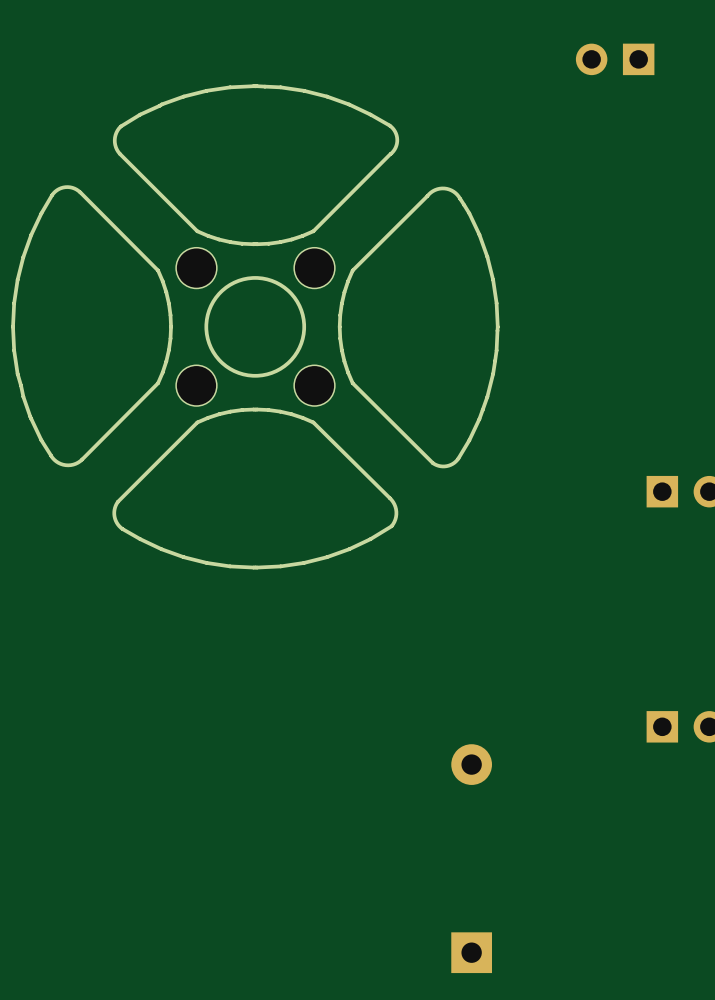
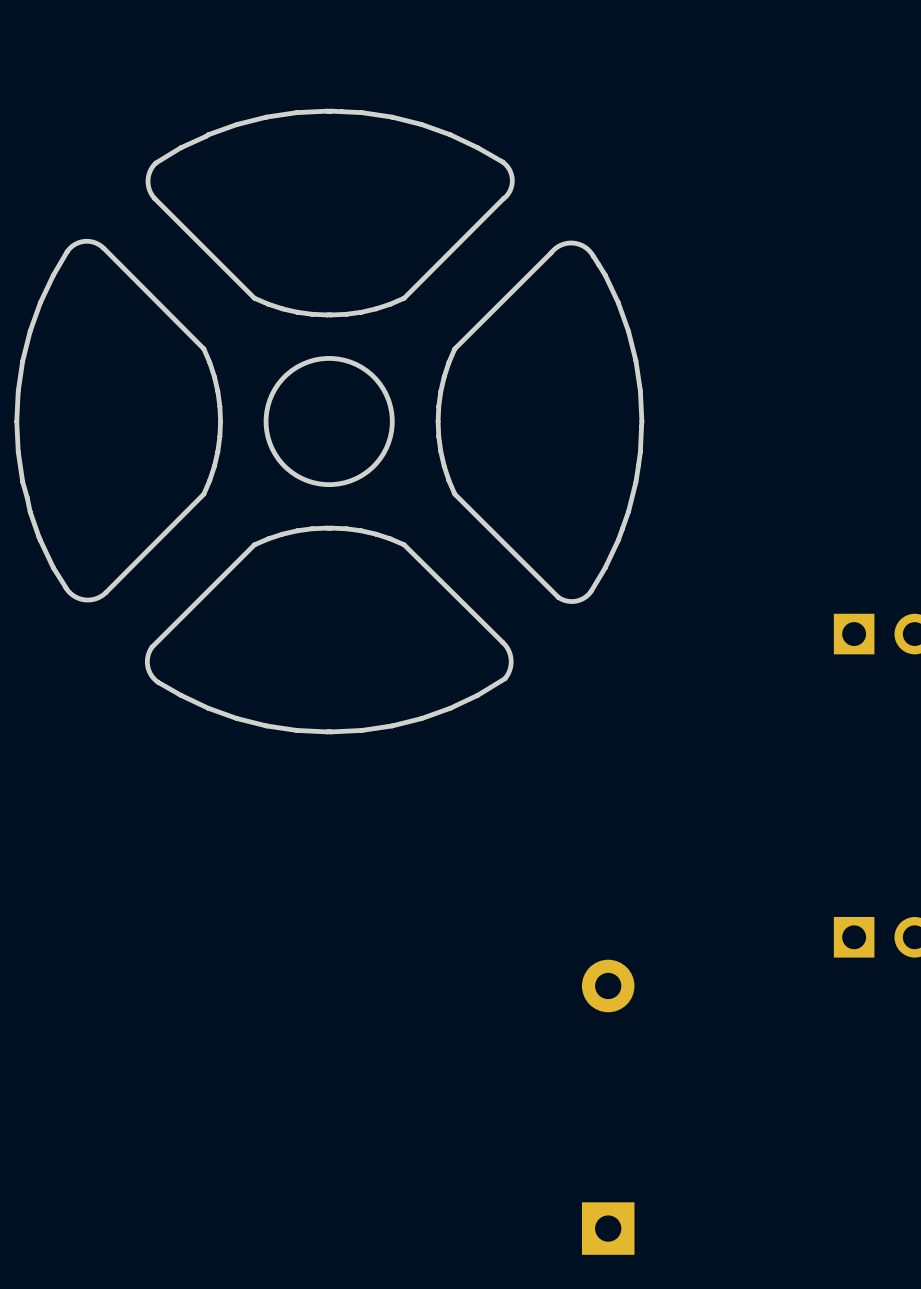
part: (615, 59) -> none
part: (196, 268) -> none
part: (314, 268) -> none
part: (196, 385) -> none
part: (314, 385) -> none

